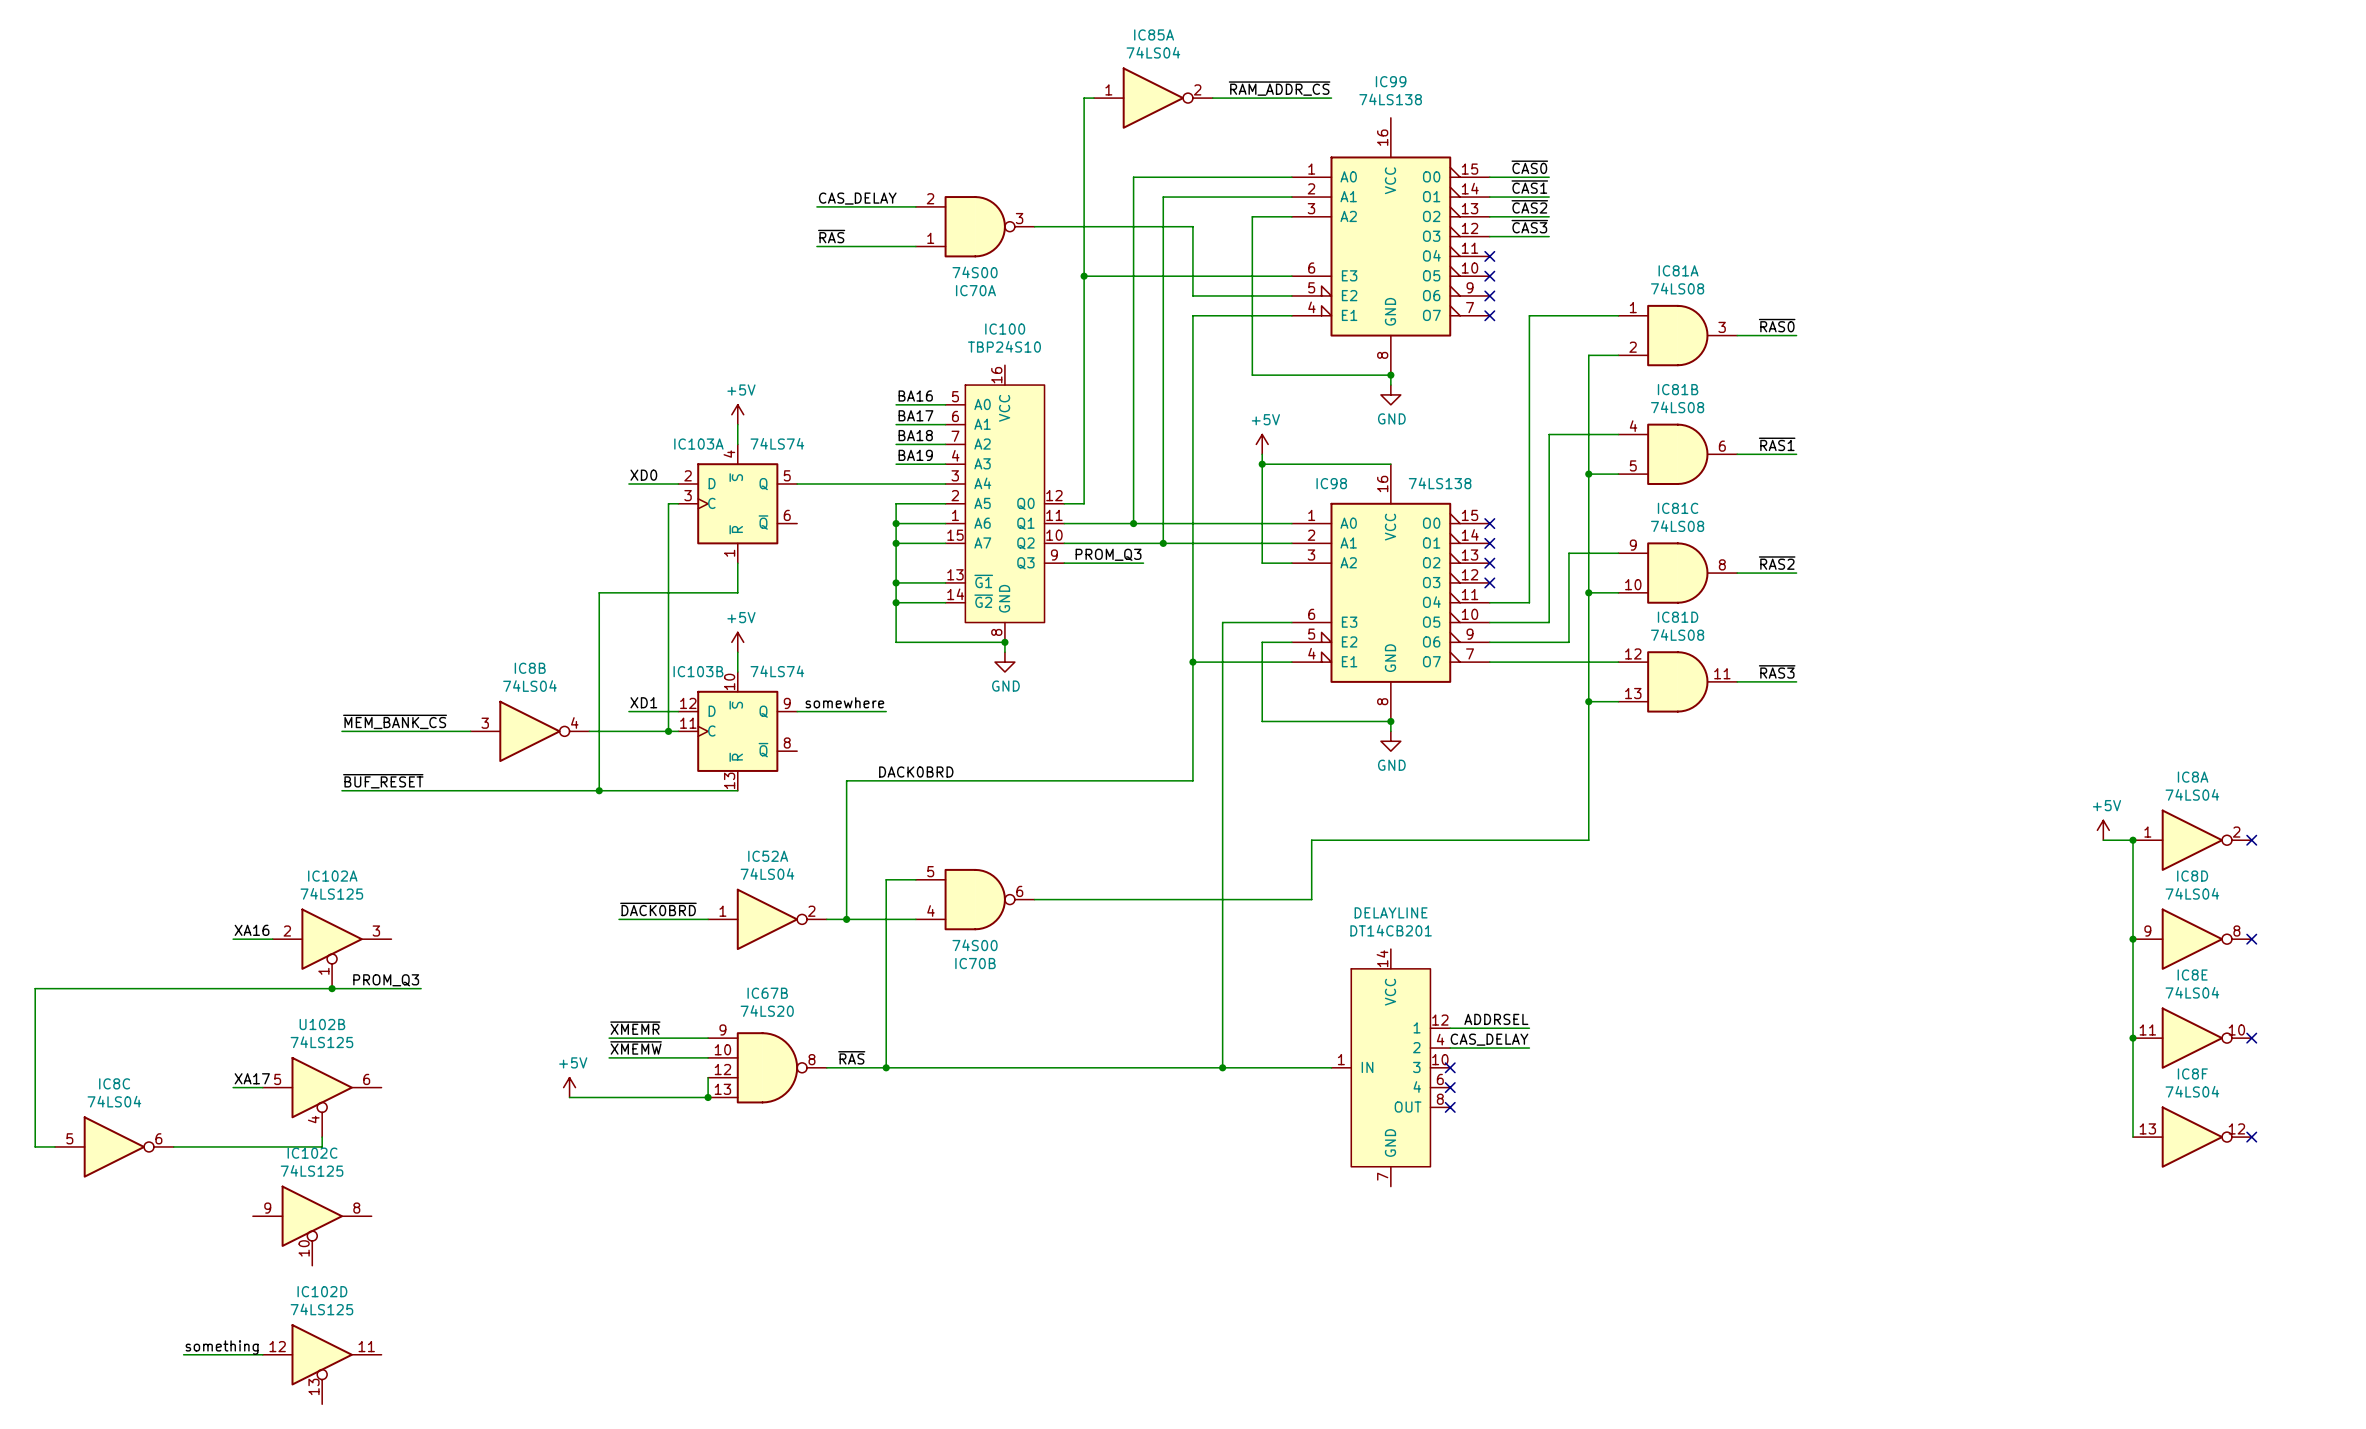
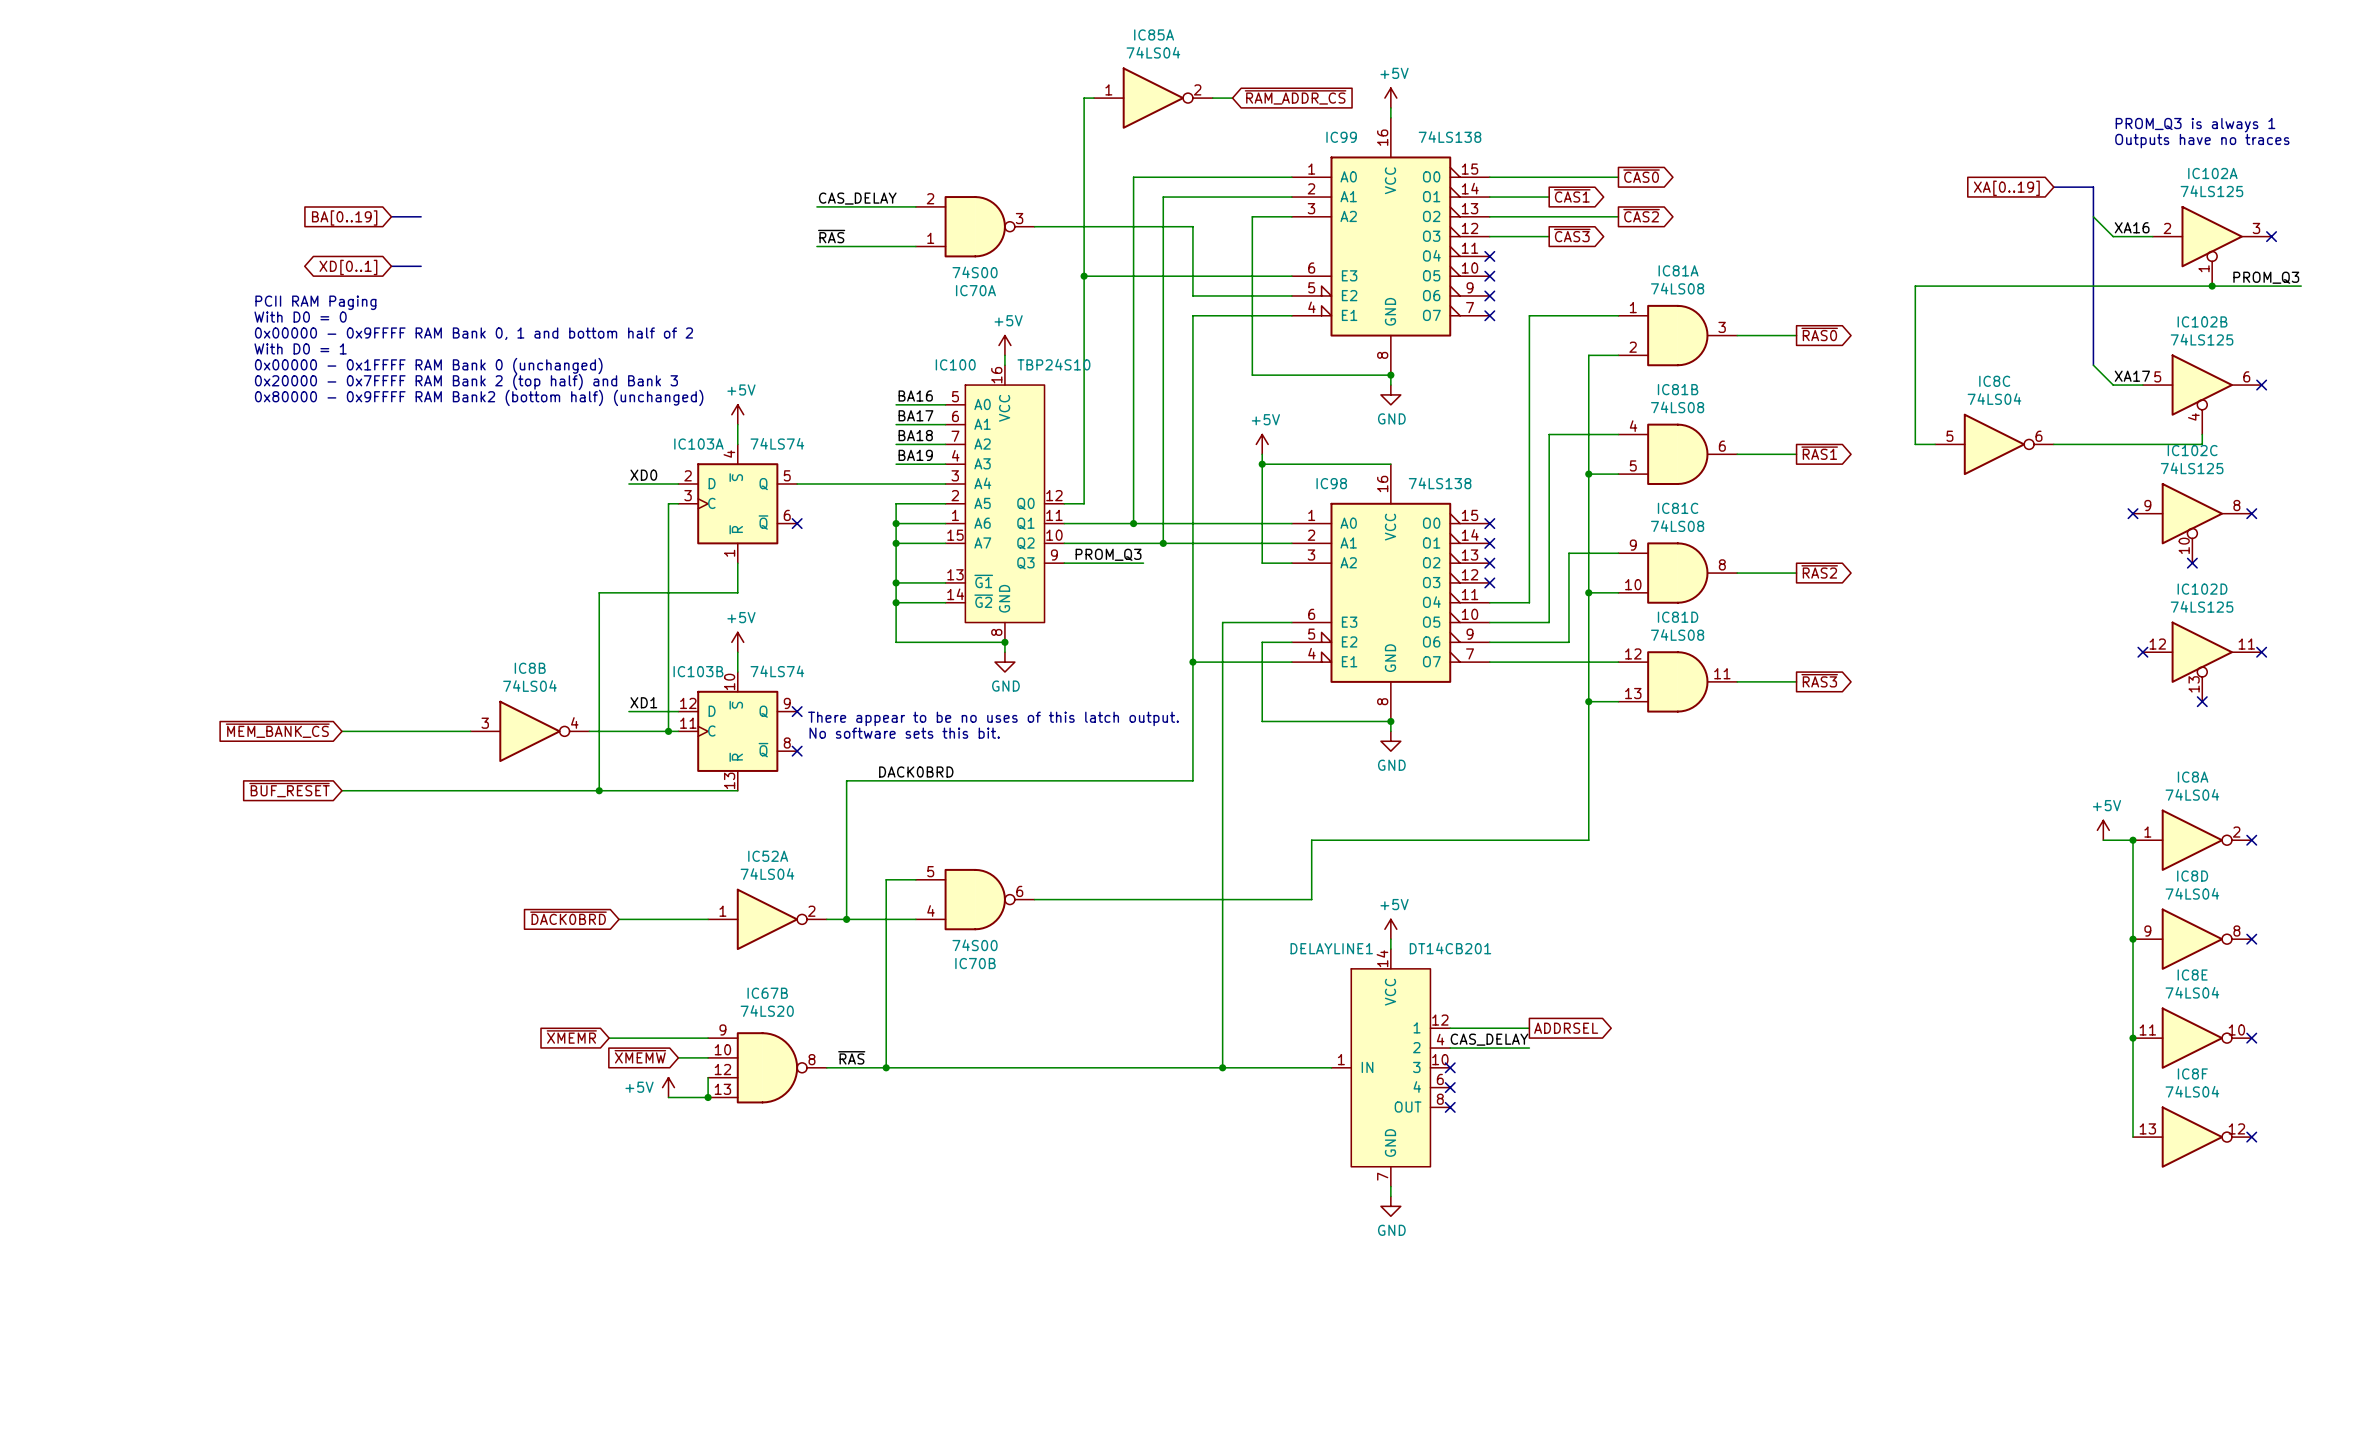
IC99 name position: IC99 (1391, 81) -> IC99 (1341, 137)
label: ~{RAM_ADDR_CS} (1279, 88) -> none
global label: none -> ~{RAM_ADDR_CS} (1295, 97)
wire: (1232, 98) (1331, 98) -> none
power symbol: none -> +5V (1390, 98)
IC99 value position: 74LS138 (1390, 99) -> 74LS138 (1449, 137)
wire: none -> (1390, 107) (1390, 117)
text: none -> PROM_Q3 is always 1 (2195, 125)
text: none -> Outputs have no traces (2202, 141)
label: ~{CAS0} (1529, 167) -> none
global label: none -> ~{CAS0} (1641, 176)
wire: none -> (1549, 177) (1618, 177)
label: ~{CAS1} (1529, 187) -> none
bus: none -> (2053, 187) (2093, 187) (2093, 365)
global label: none -> XA[0..19] (2006, 188)
global label: none -> ~{CAS1} (1572, 195)
label: ~{CAS2} (1529, 206) -> none
global label: none -> ~{CAS2} (1641, 215)
bus: none -> (391, 216) (421, 216)
wire: none -> (1549, 216) (1618, 216)
wire: none -> (2093, 216) (2113, 236) (2152, 236)
global label: none -> BA[0..19] (344, 218)
label: ~{CAS3} (1529, 226) -> none
label: none -> XA16 (2132, 227)
global label: none -> ~{CAS3} (1572, 235)
no-connect mark: none -> (2271, 236)
bus: none -> (391, 266) (421, 266)
global label: none -> XD[0..1] (348, 267)
label: none -> PROM_Q3 (2266, 277)
junction: none -> (2212, 286)
wire: none -> (2301, 286) (1915, 286) (1915, 444) (1935, 444)
text: none -> PCII RAM Paging (315, 302)
text: none -> With D0 = 0 (300, 317)
label: ~{RAS0} (1777, 325) -> none
IC100 name position: IC100 (1005, 329) -> IC100 (955, 364)
text: none -> 0x00000 - 0x9FFFF RAM Bank 0, 1 and bottom half of 2 (473, 333)
global label: none -> ~{RAS0} (1819, 334)
power symbol: none -> +5V (1004, 345)
IC100 value position: TBP24S10 (1004, 346) -> TBP24S10 (1053, 364)
text: none -> With D0 = 1 (300, 348)
wire: none -> (1004, 355) (1004, 365)
wire: none -> (2093, 365) (2113, 385) (2142, 385)
text: none -> 0x00000 - 0x1FFFF RAM Bank 0 (unchanged) (428, 366)
label: none -> XA17 (2132, 376)
text: none -> 0x20000 - 0x7FFFF RAM Bank 2 (top half) and Bank 3 (466, 381)
no-connect mark: none -> (2261, 385)
IC102B: none -> 74LS125 (2202, 394)
text: none -> 0x80000 - 0x9FFFF RAM Bank2 (bottom half) (unchanged) (479, 397)
wire: none -> (2202, 434) (2202, 444) (2053, 444)
label: ~{RAS1} (1777, 444) -> none
global label: none -> ~{RAS1} (1819, 453)
no-connect mark: none -> (2133, 513)
no-connect mark: none -> (2251, 513)
no-connect mark: none -> (797, 523)
label: ~{RAS2} (1777, 563) -> none
no-connect mark: none -> (2192, 563)
global label: none -> ~{RAS2} (1819, 571)
no-connect mark: none -> (2142, 652)
no-connect mark: none -> (2261, 652)
label: ~{RAS3} (1777, 671) -> none
global label: none -> ~{RAS3} (1819, 680)
no-connect mark: none -> (2202, 701)
label: somewhere (844, 702) -> none
wire: (797, 711) (886, 711) -> none
no-connect mark: none -> (797, 711)
text: none -> There appear to be no uses of this latch output. (993, 718)
label: ~{MEM_BANK_CS} (395, 721) -> none
global label: none -> ~{MEM_BANK_CS} (277, 730)
text: none -> No software sets this bit. (904, 733)
no-connect mark: none -> (797, 751)
label: ~{BUF_RESET} (383, 781) -> none
global label: none -> ~{BUF_RESET} (289, 790)
label: ~{DACK0BRD} (658, 909) -> none
DELAYLINE name: DELAYLINE (1391, 912) -> DELAYLINE1 (1331, 948)
global label: none -> ~{DACK0BRD} (568, 918)
power symbol: none -> +5V (1390, 929)
label: XA16 (252, 930) -> none
DELAYLINE value position: DT14CB201 (1391, 930) -> DT14CB201 (1450, 948)
wire: (233, 939) (272, 939) -> none
wire: none -> (1390, 939) (1390, 949)
IC102A position: (332, 948) -> (2212, 246)
label: PROM_Q3 (386, 980) -> none
junction: (332, 988) -> none
wire: (421, 988) (35, 988) (35, 1146) (55, 1146) -> none
label: ADDRSEL (1496, 1019) -> none
label: ~{XMEMR} (635, 1028) -> none
global label: none -> ADDRSEL (1566, 1028)
global label: none -> ~{XMEMR} (571, 1036)
label: ~{XMEMW} (636, 1047) -> none
global label: none -> ~{XMEMW} (640, 1056)
wire: (609, 1057) (678, 1057) -> none
power symbol text position: +5V (573, 1062) -> +5V (639, 1087)
label: XA17 (252, 1078) -> none
wire: (233, 1087) (262, 1087) -> none
power symbol position: +5V (569, 1087) -> +5V (668, 1087)
U102B: 74LS125 (322, 1097) -> none
wire: (569, 1097) (668, 1097) -> none
wire: (322, 1137) (322, 1146) (173, 1146) -> none
IC8C position: (114, 1146) -> (1994, 444)
wire: none -> (1390, 1186) (1390, 1196)
power symbol: none -> GND (1390, 1206)
IC102C position: (312, 1225) -> (2192, 523)
label: something (222, 1347) -> none
wire: (183, 1354) (262, 1354) -> none
IC102D position: (322, 1364) -> (2202, 661)

